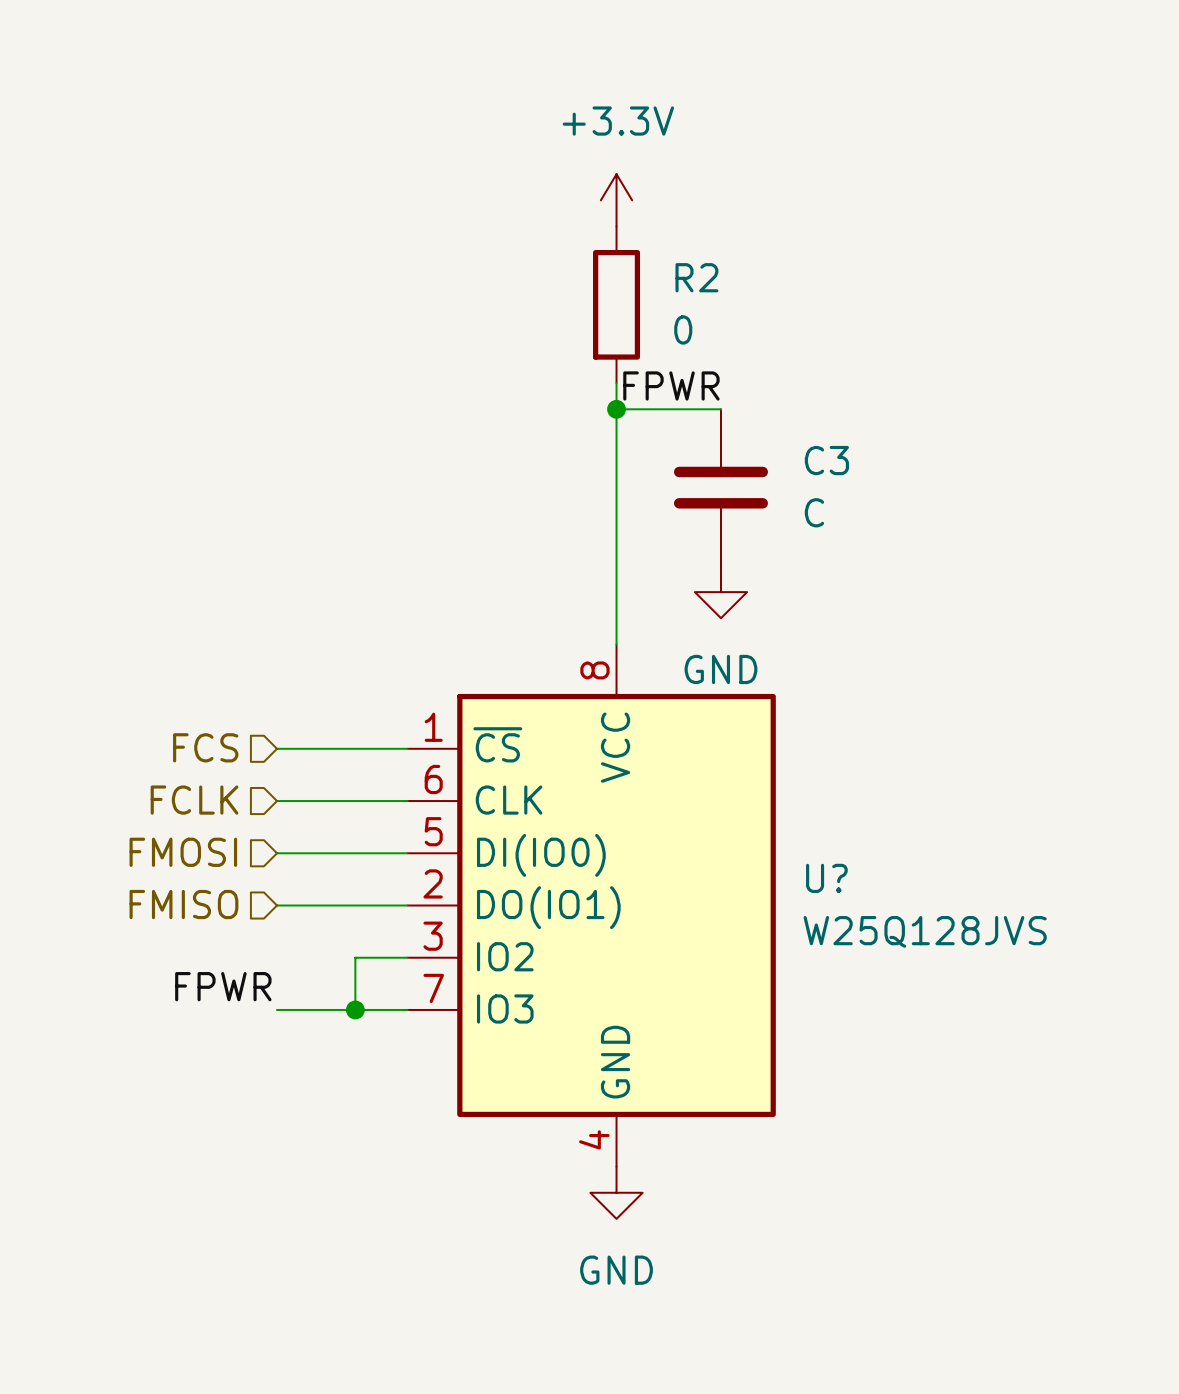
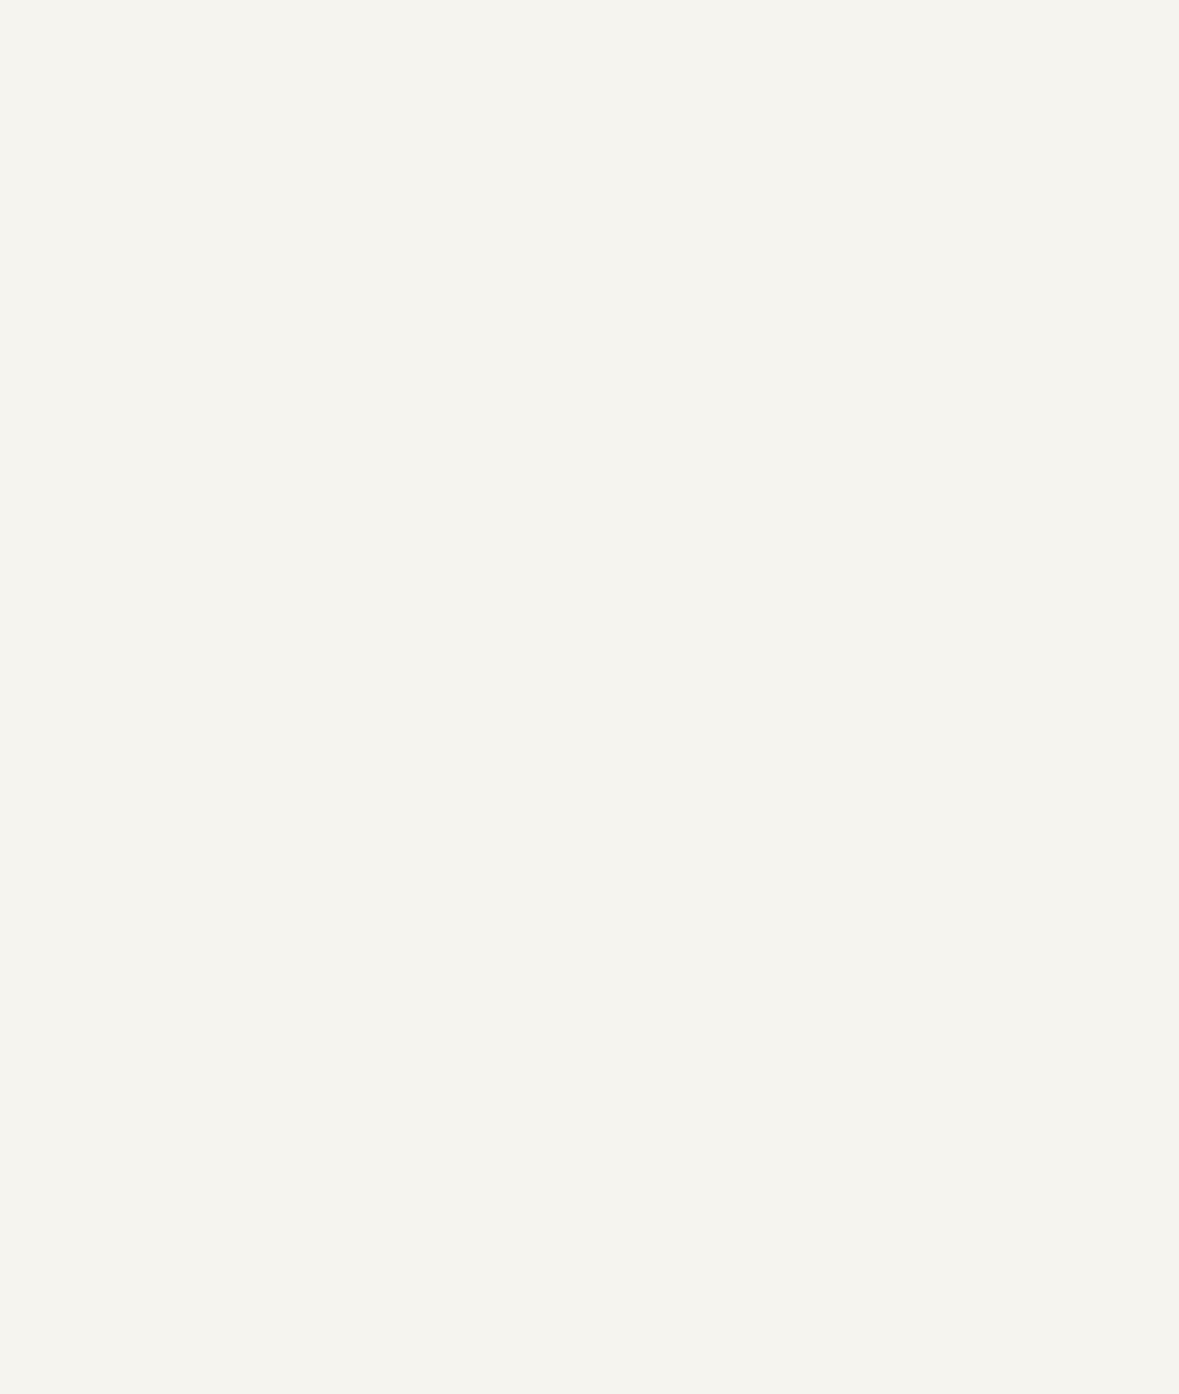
power symbol: +3.3V (616, 200) -> none
R2: 0 (616, 304) -> none
wire: (616, 383) (616, 644) -> none
label: FPWR (671, 385) -> none
wire: (616, 409) (720, 409) -> none
junction: (616, 409) -> none
C3: C (720, 487) -> none
power symbol: GND (720, 592) -> none
hierarchical label: FCS (205, 747) -> none
wire: (277, 748) (407, 748) -> none
hierarchical label: FCLK (194, 800) -> none
wire: (277, 801) (407, 801) -> none
hierarchical label: FMOSI (183, 852) -> none
wire: (277, 853) (407, 853) -> none
hierarchical label: FMISO (183, 904) -> none
wire: (277, 905) (407, 905) -> none
U?: W25Q128JVS (591, 905) -> none
wire: (407, 957) (355, 957) (355, 1009) -> none
label: FPWR (223, 986) -> none
wire: (277, 1009) (407, 1009) -> none
junction: (355, 1009) -> none
power symbol: GND (616, 1192) -> none

